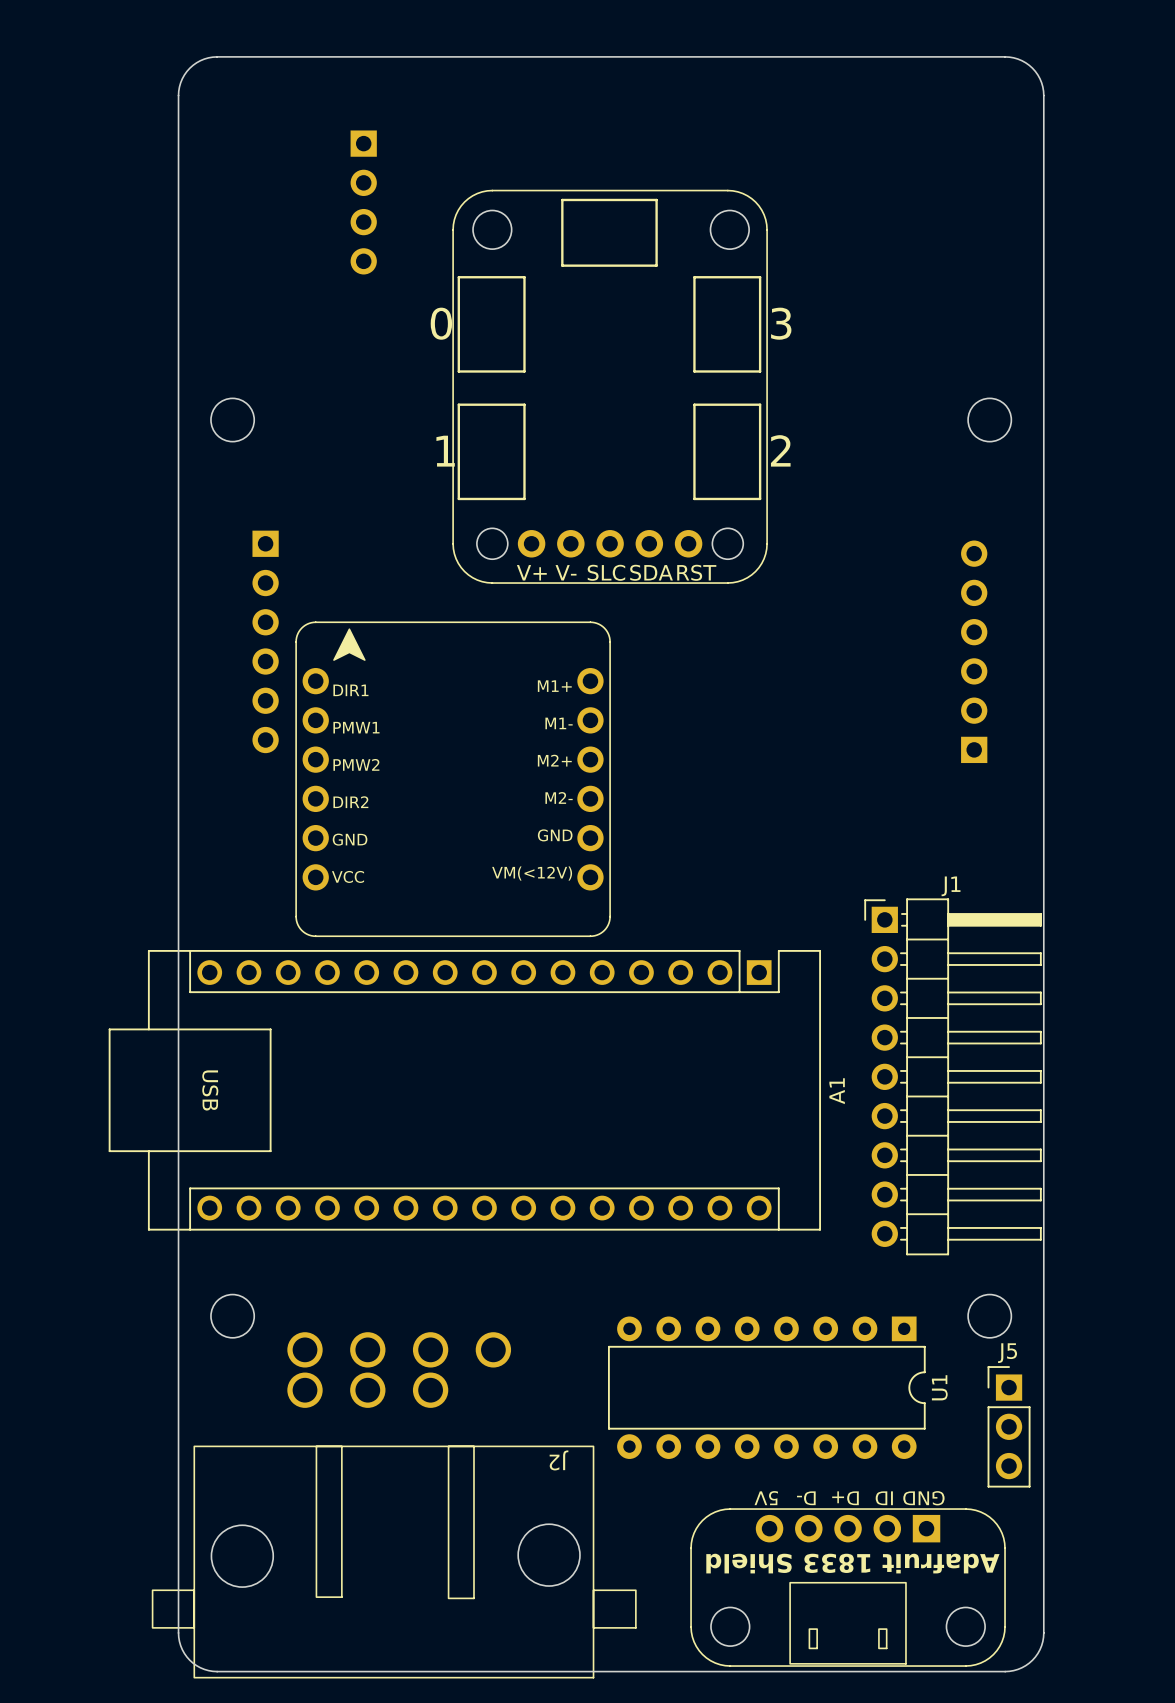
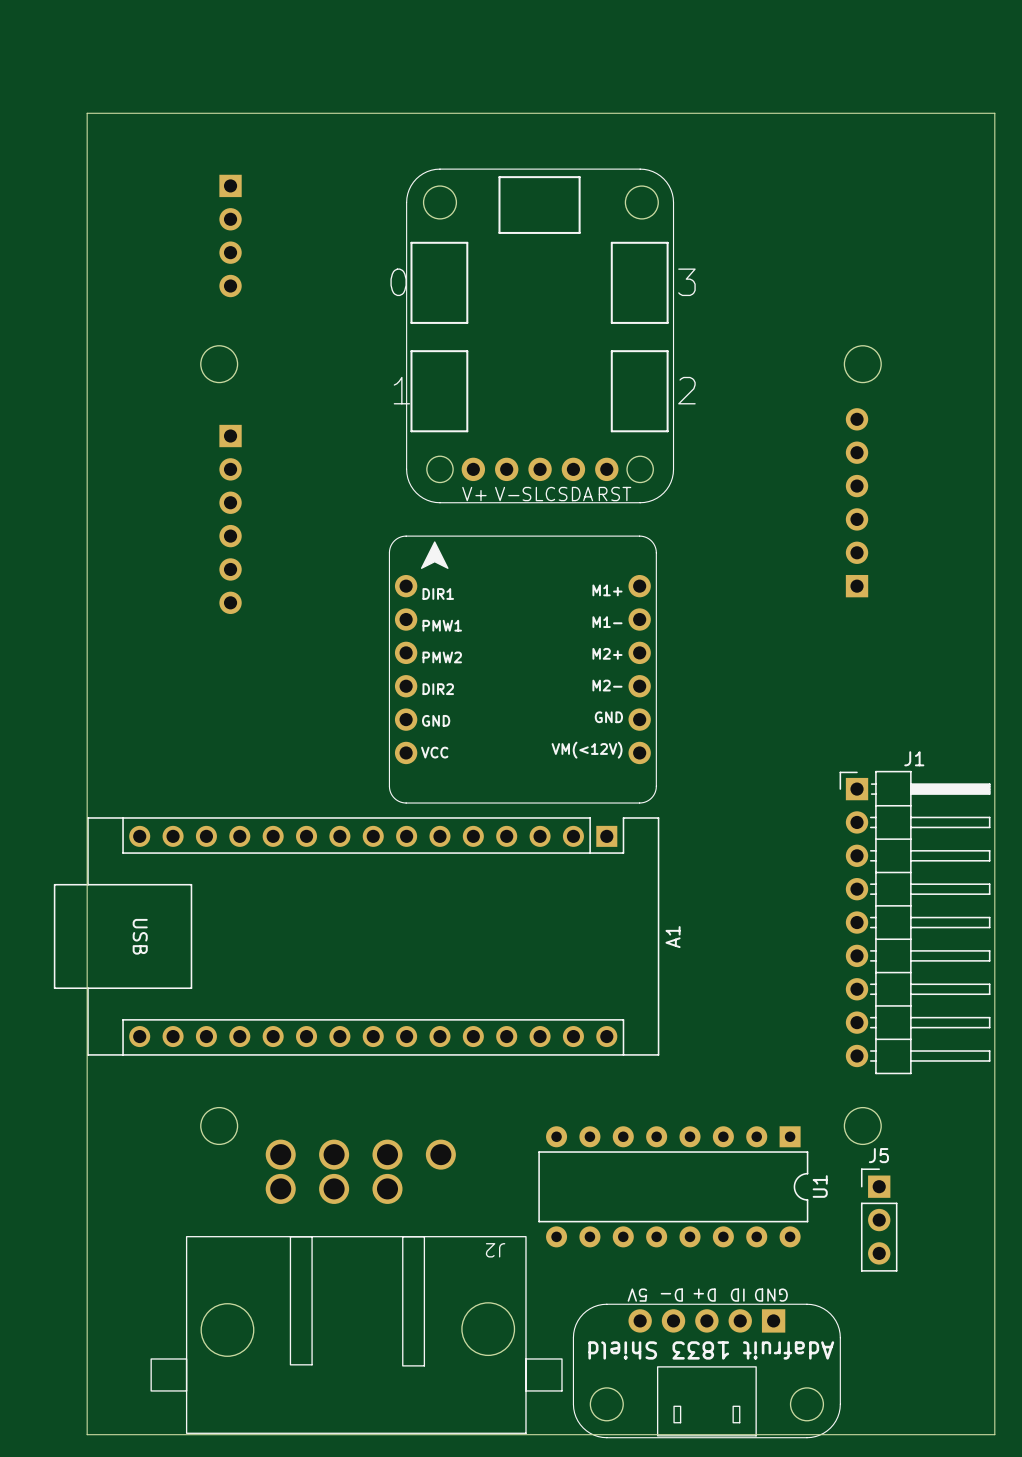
board edge: (217, 56) (1005, 56) (1025, 62) (1039, 78) (1043, 95) (1043, 1632) (1037, 1653) (1021, 1667) (1005, 1671) (217, 1671) (196, 1665) (182, 1649) (178, 1632) (178, 95) (182, 78) (189, 68) (200, 60) (217, 56) -> (87, 113) (87, 1434) (994, 1434) (994, 113) (87, 113)
part position: (363, 202) -> (230, 235)
part position: (265, 641) -> (230, 519)
part position: (974, 651) -> (857, 502)
part position: (453, 779) -> (522, 669)
J1 position: (953, 1076) -> (915, 922)
A1 position: (464, 1090) -> (356, 936)
part position: (848, 1587) -> (706, 1370)

